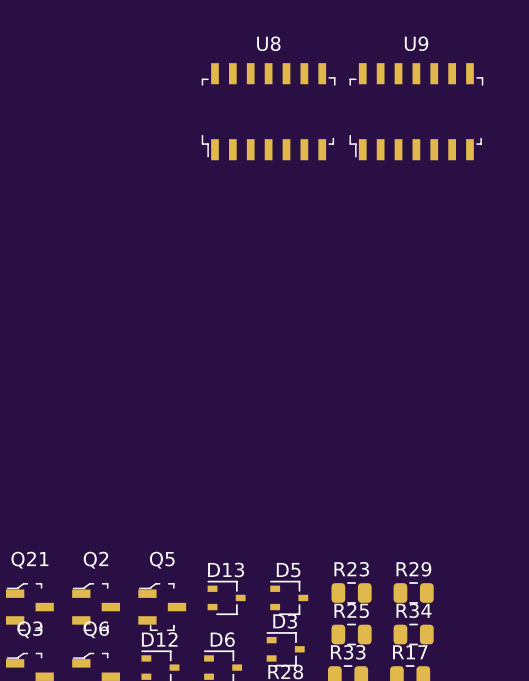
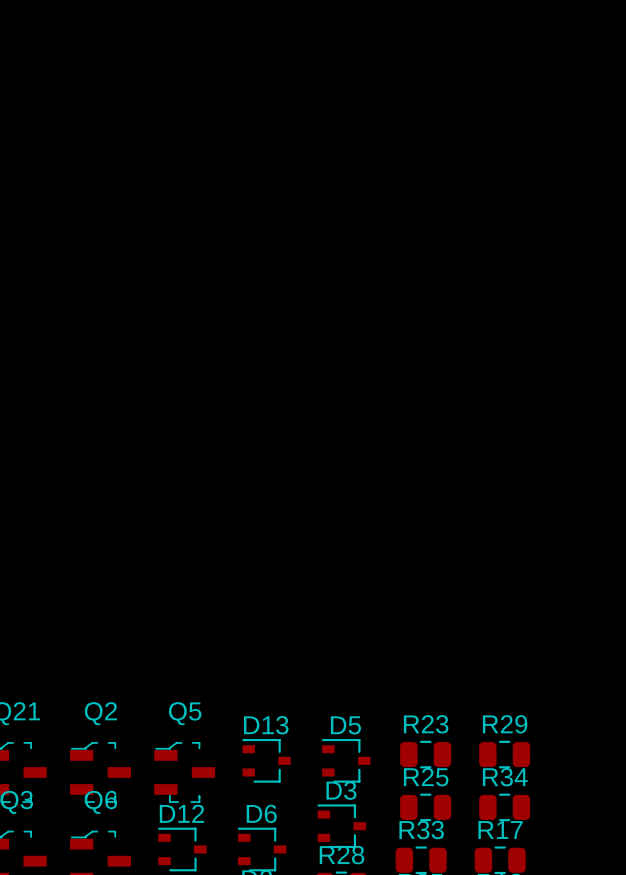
U8: (268, 111) -> none
U9: (416, 111) -> none

